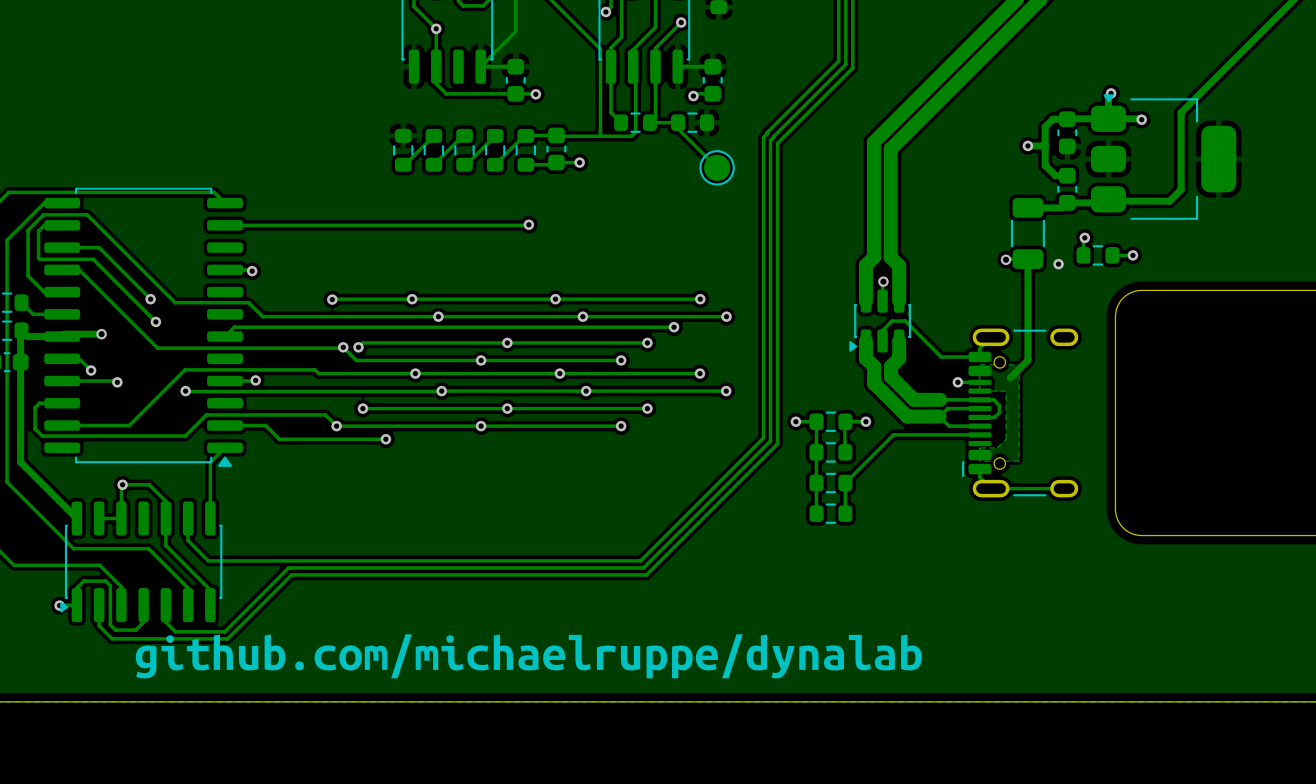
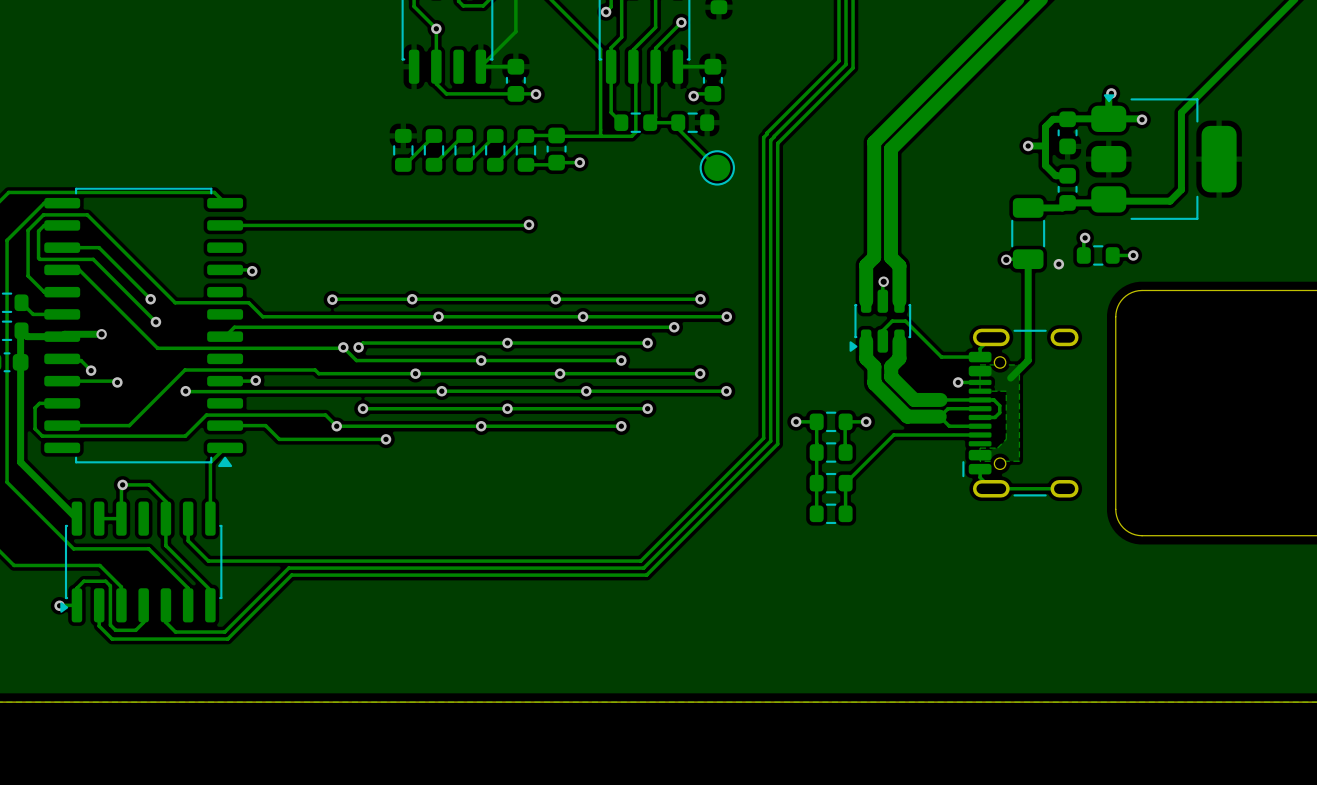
drawing: [135, 634, 922, 679] -> none

